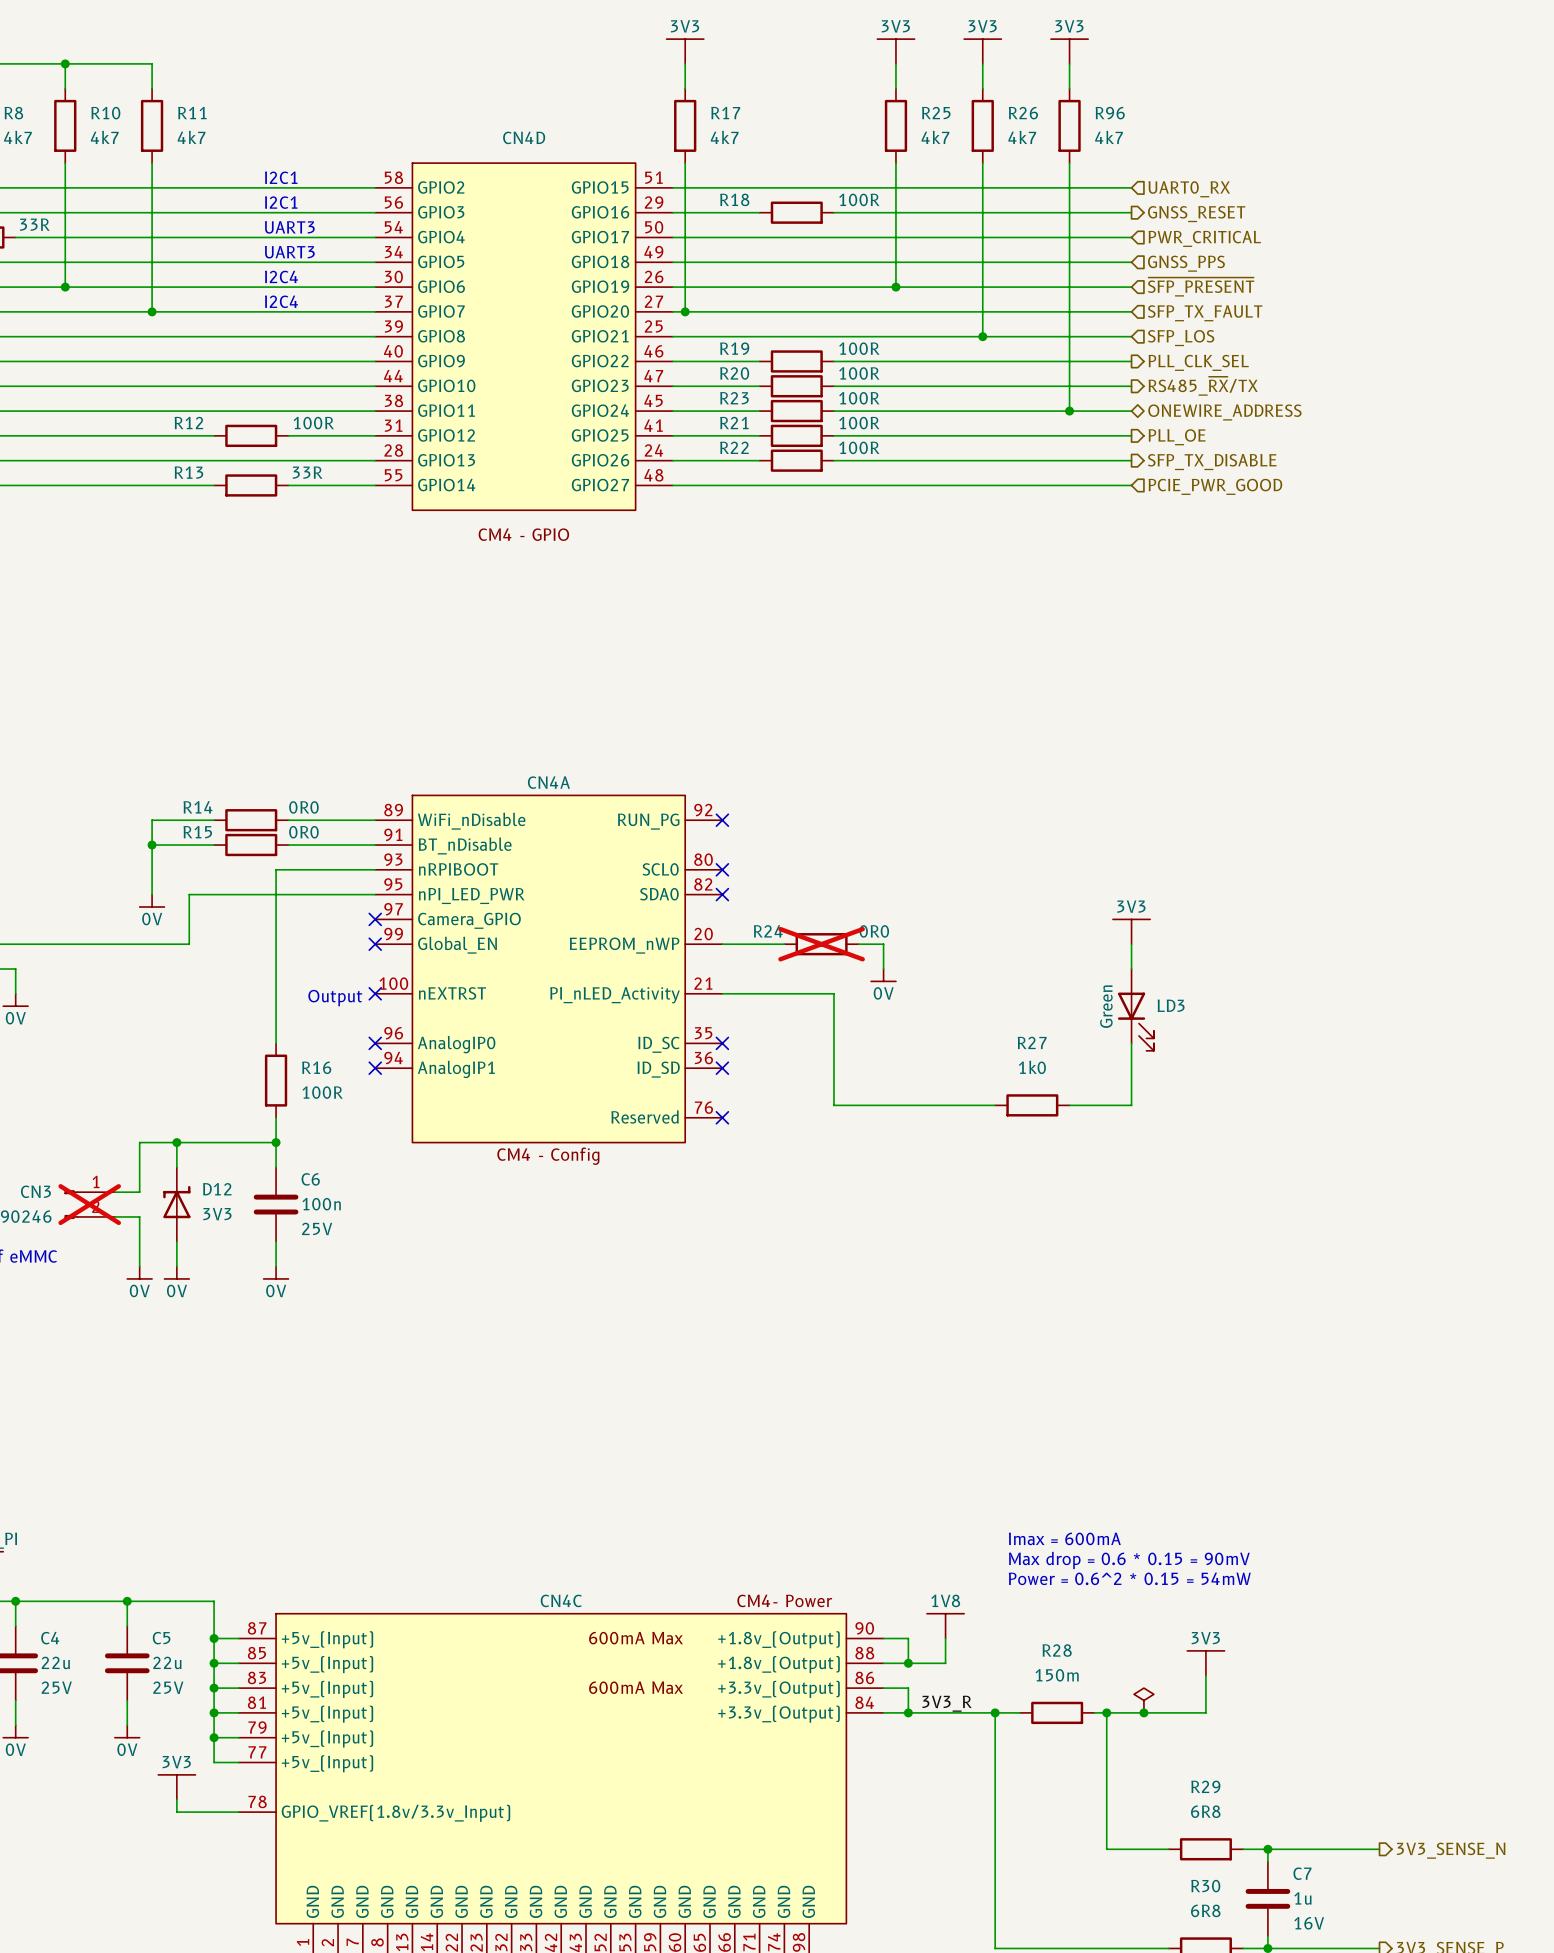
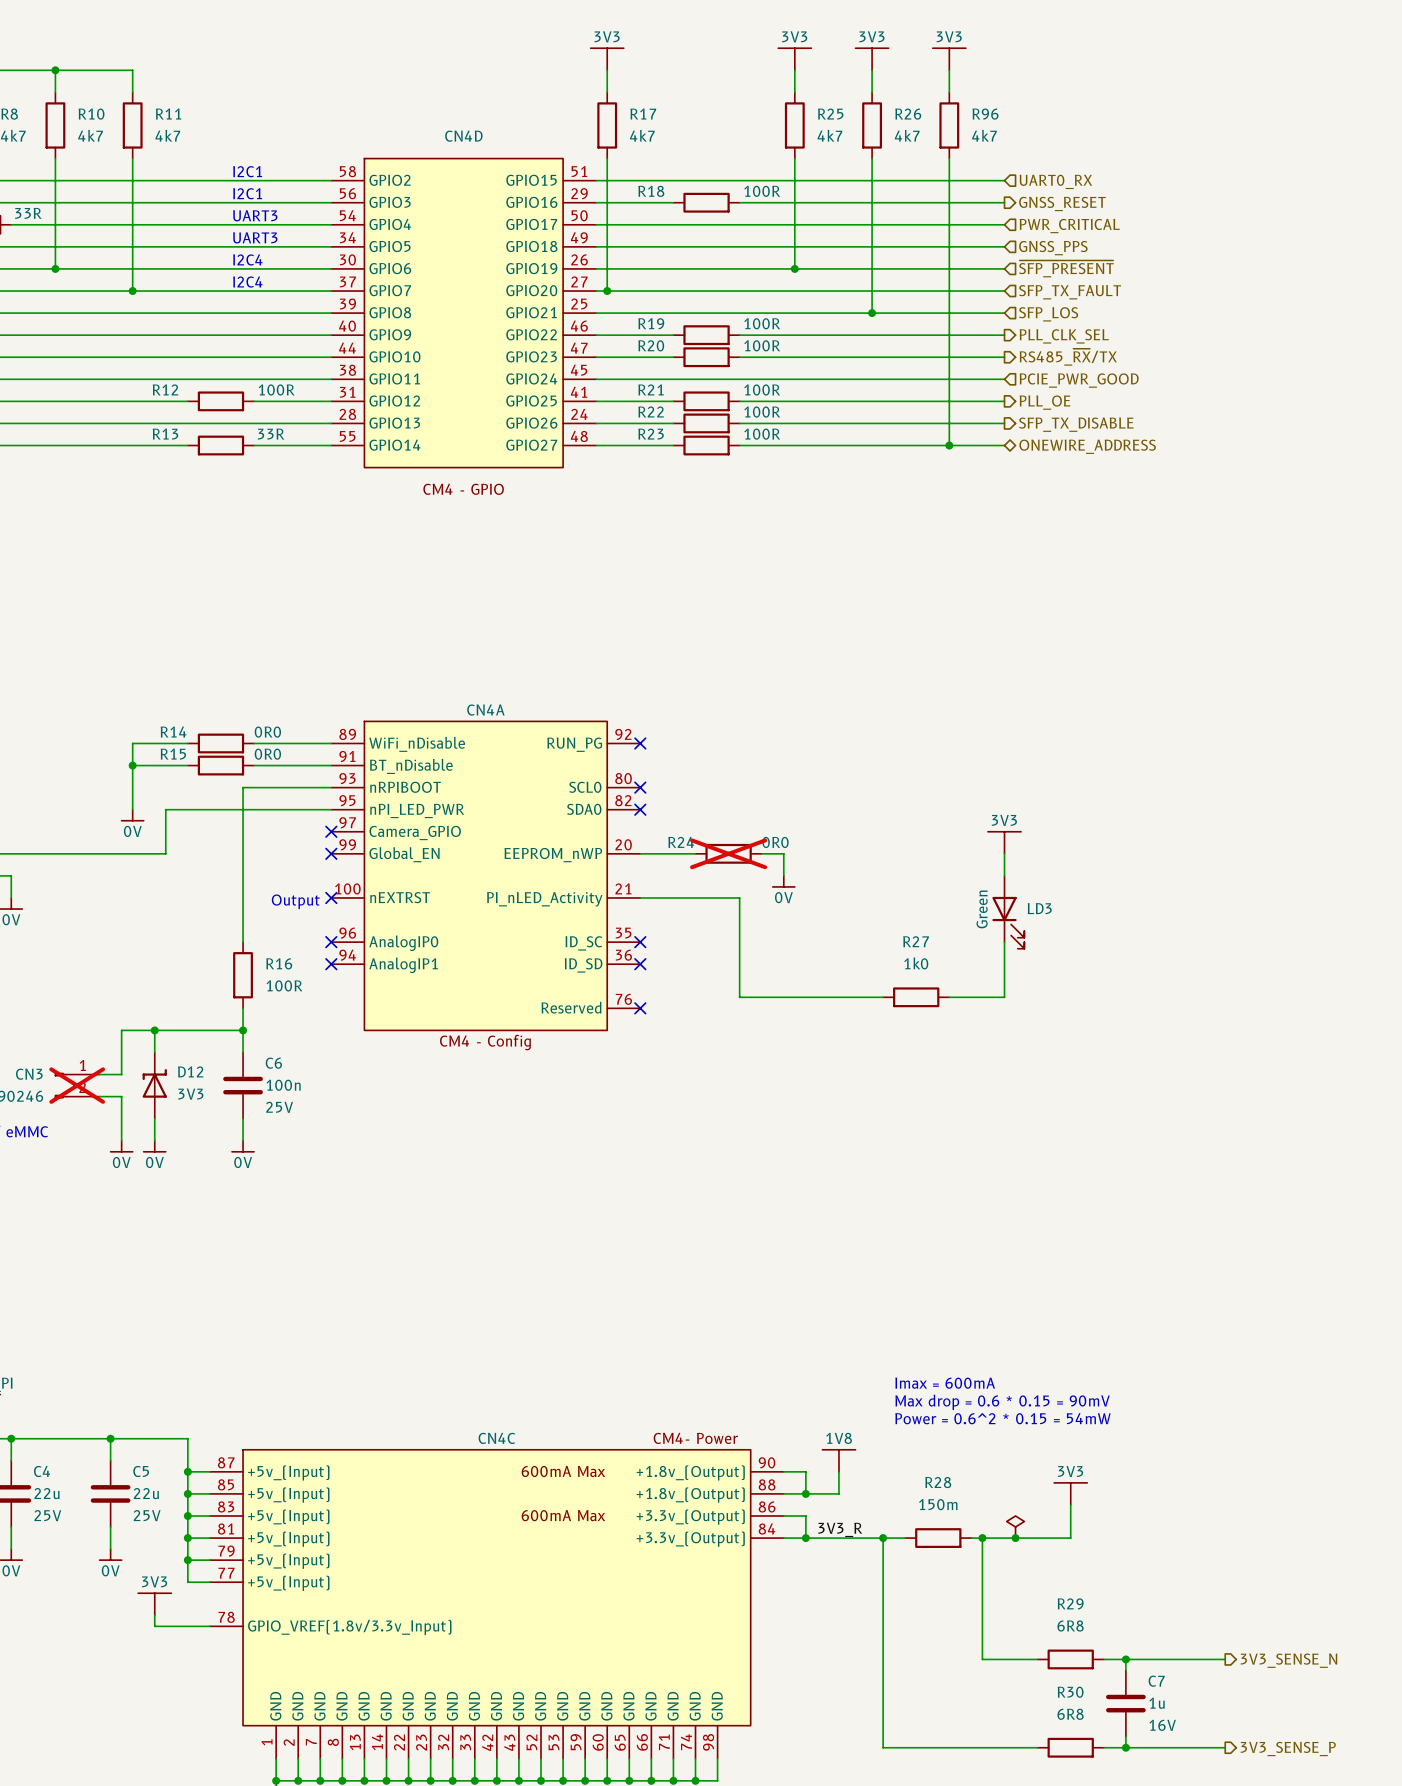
R23 position: (796, 411) -> (706, 445)
wire: none -> (949, 379) (949, 445)
junction: (1069, 411) -> none
hierarchical label shape: bidirectional (1224, 412) -> input (1079, 380)
hierarchical label: ONEWIRE_ADDRESS (1224, 412) -> PCIE_PWR_GOOD (1079, 380)
wire: (759, 485) (833, 485) -> (673, 379) (739, 379)
junction: none -> (949, 445)
hierarchical label shape: input (1215, 486) -> bidirectional (1087, 446)
hierarchical label: PCIE_PWR_GOOD (1215, 486) -> ONEWIRE_ADDRESS (1087, 446)

